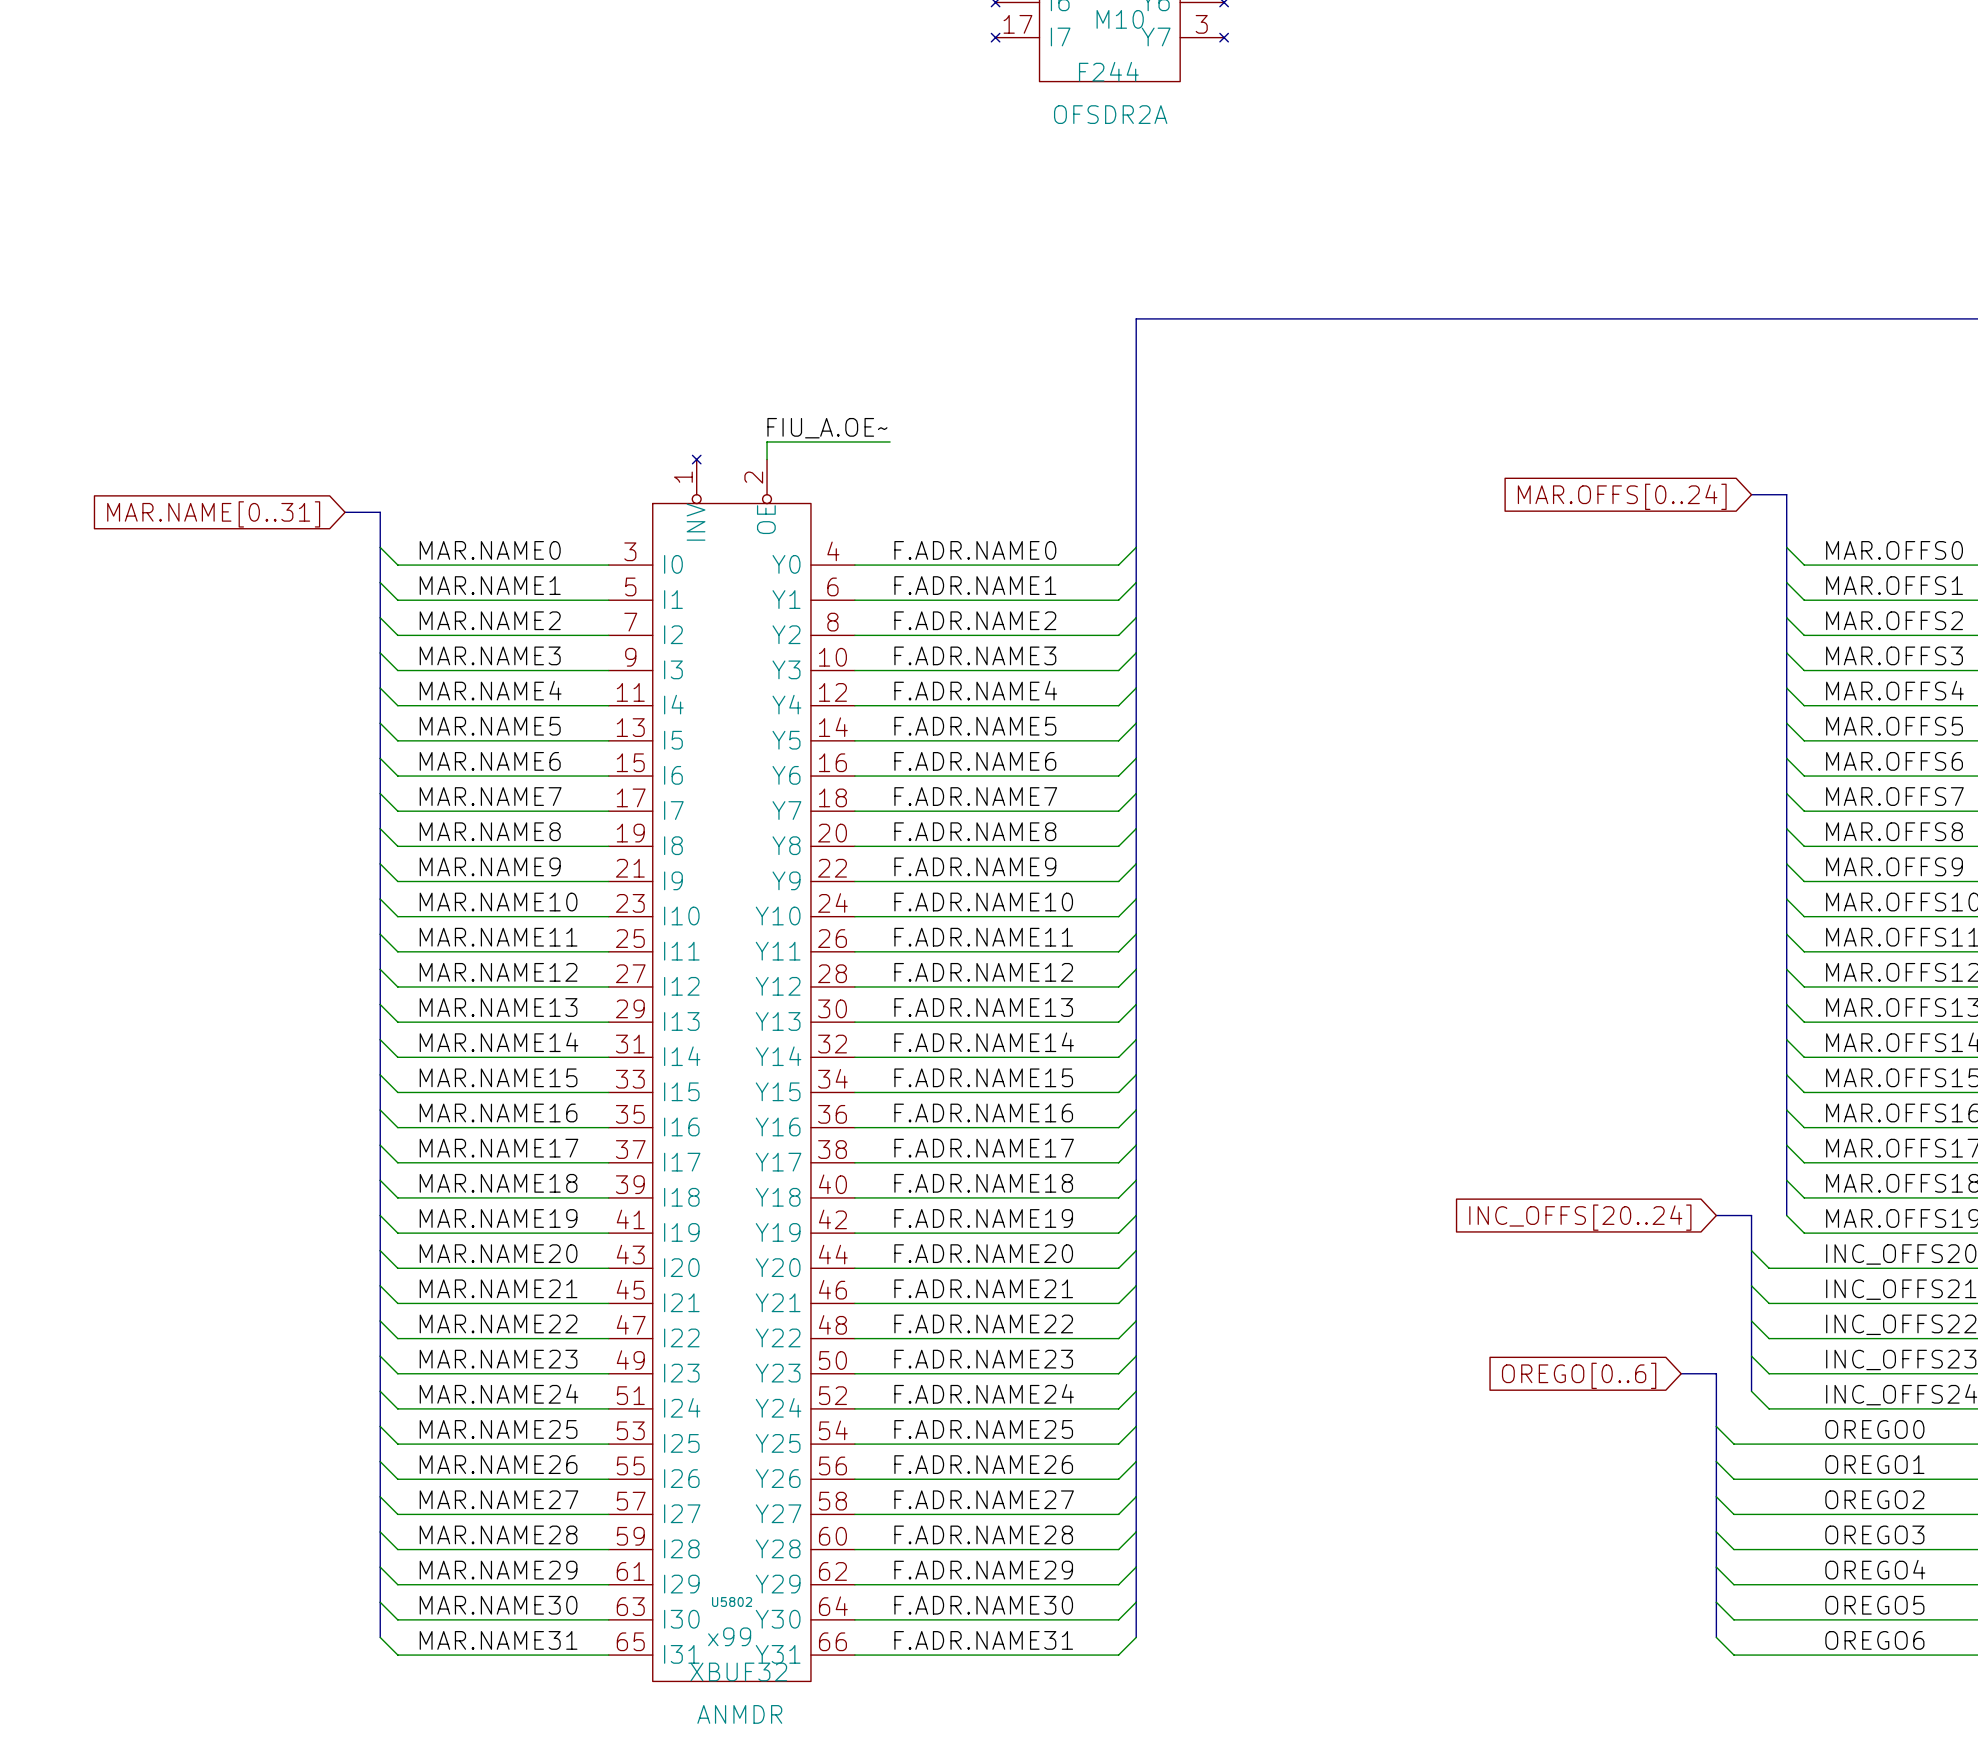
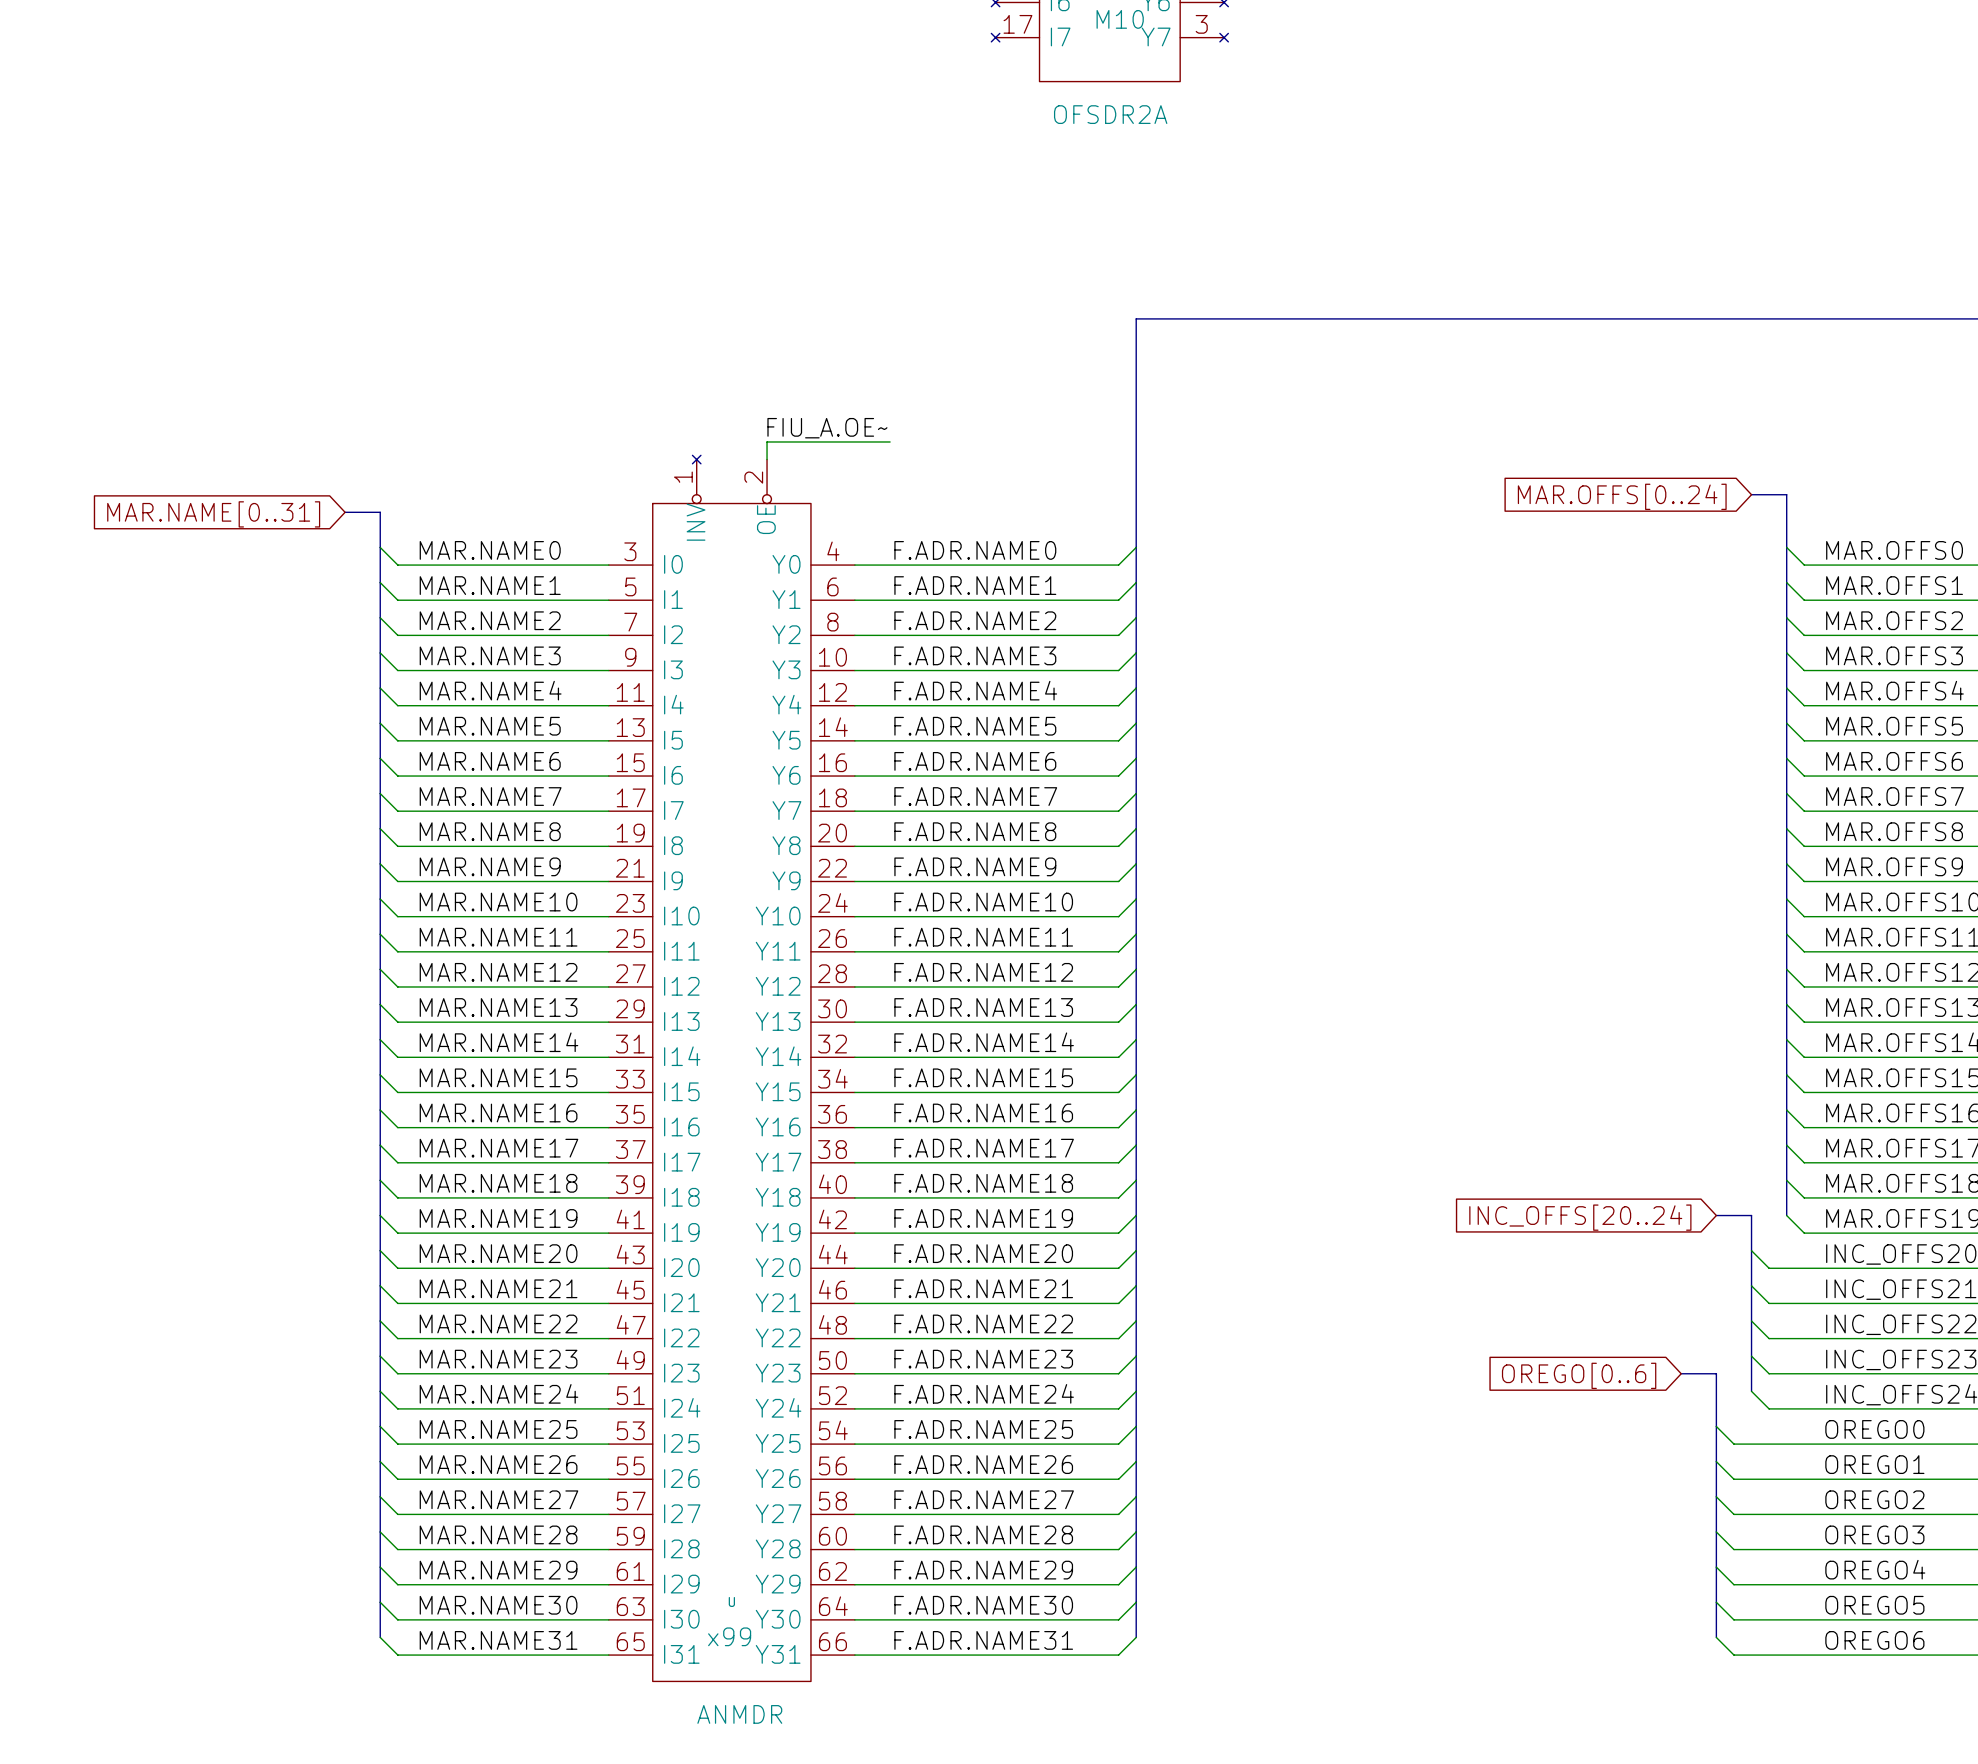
part value: F244 (1108, 71) -> none
U5802 name: U5802 (732, 1601) -> U (731, 1601)
U5802 value: XBUF32 (738, 1671) -> none

